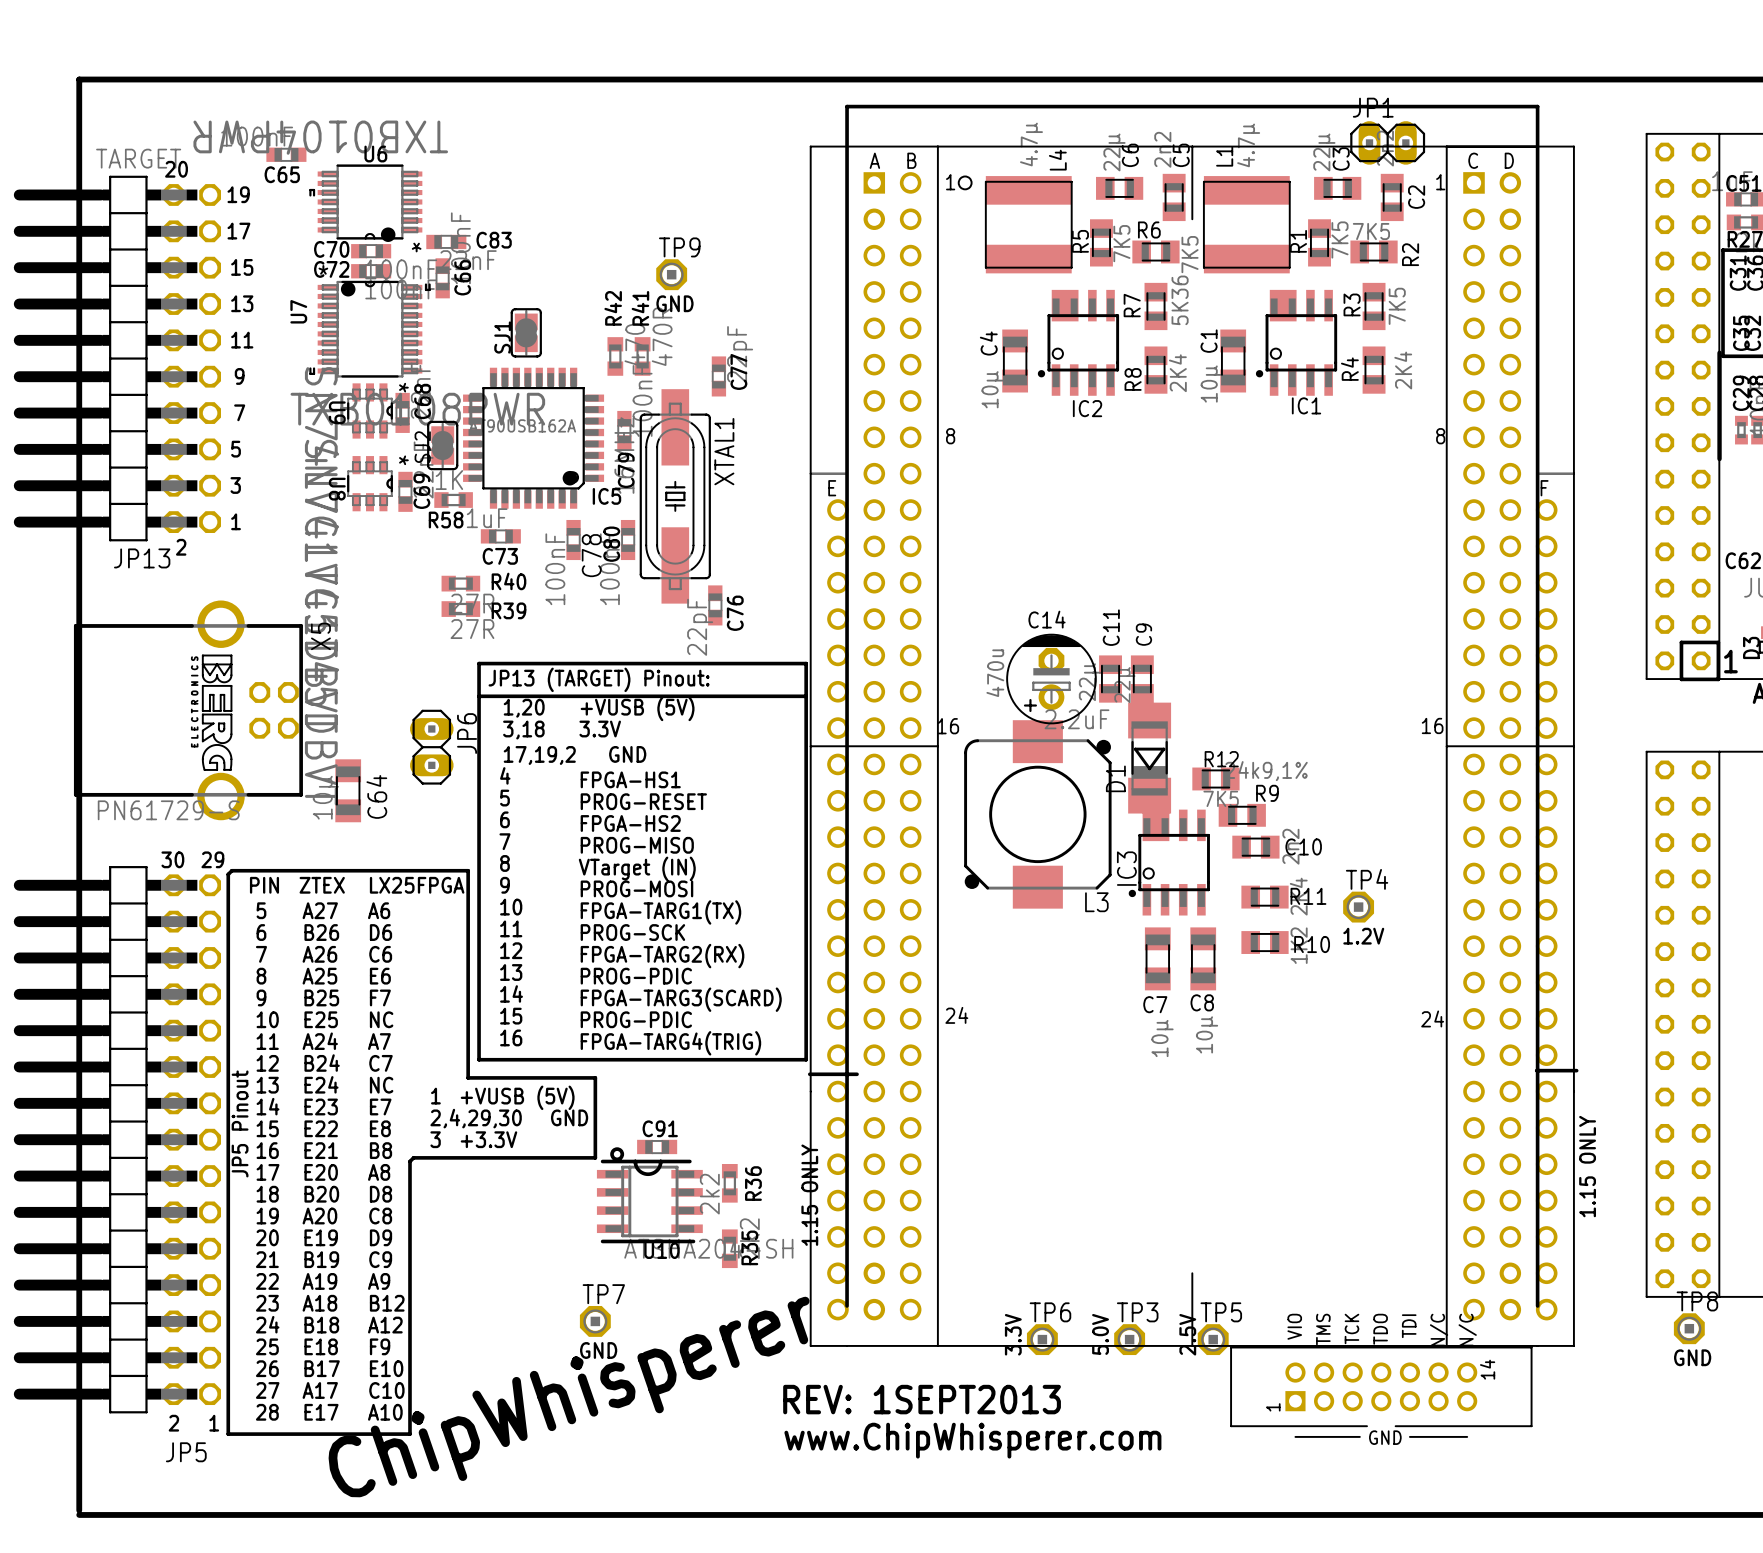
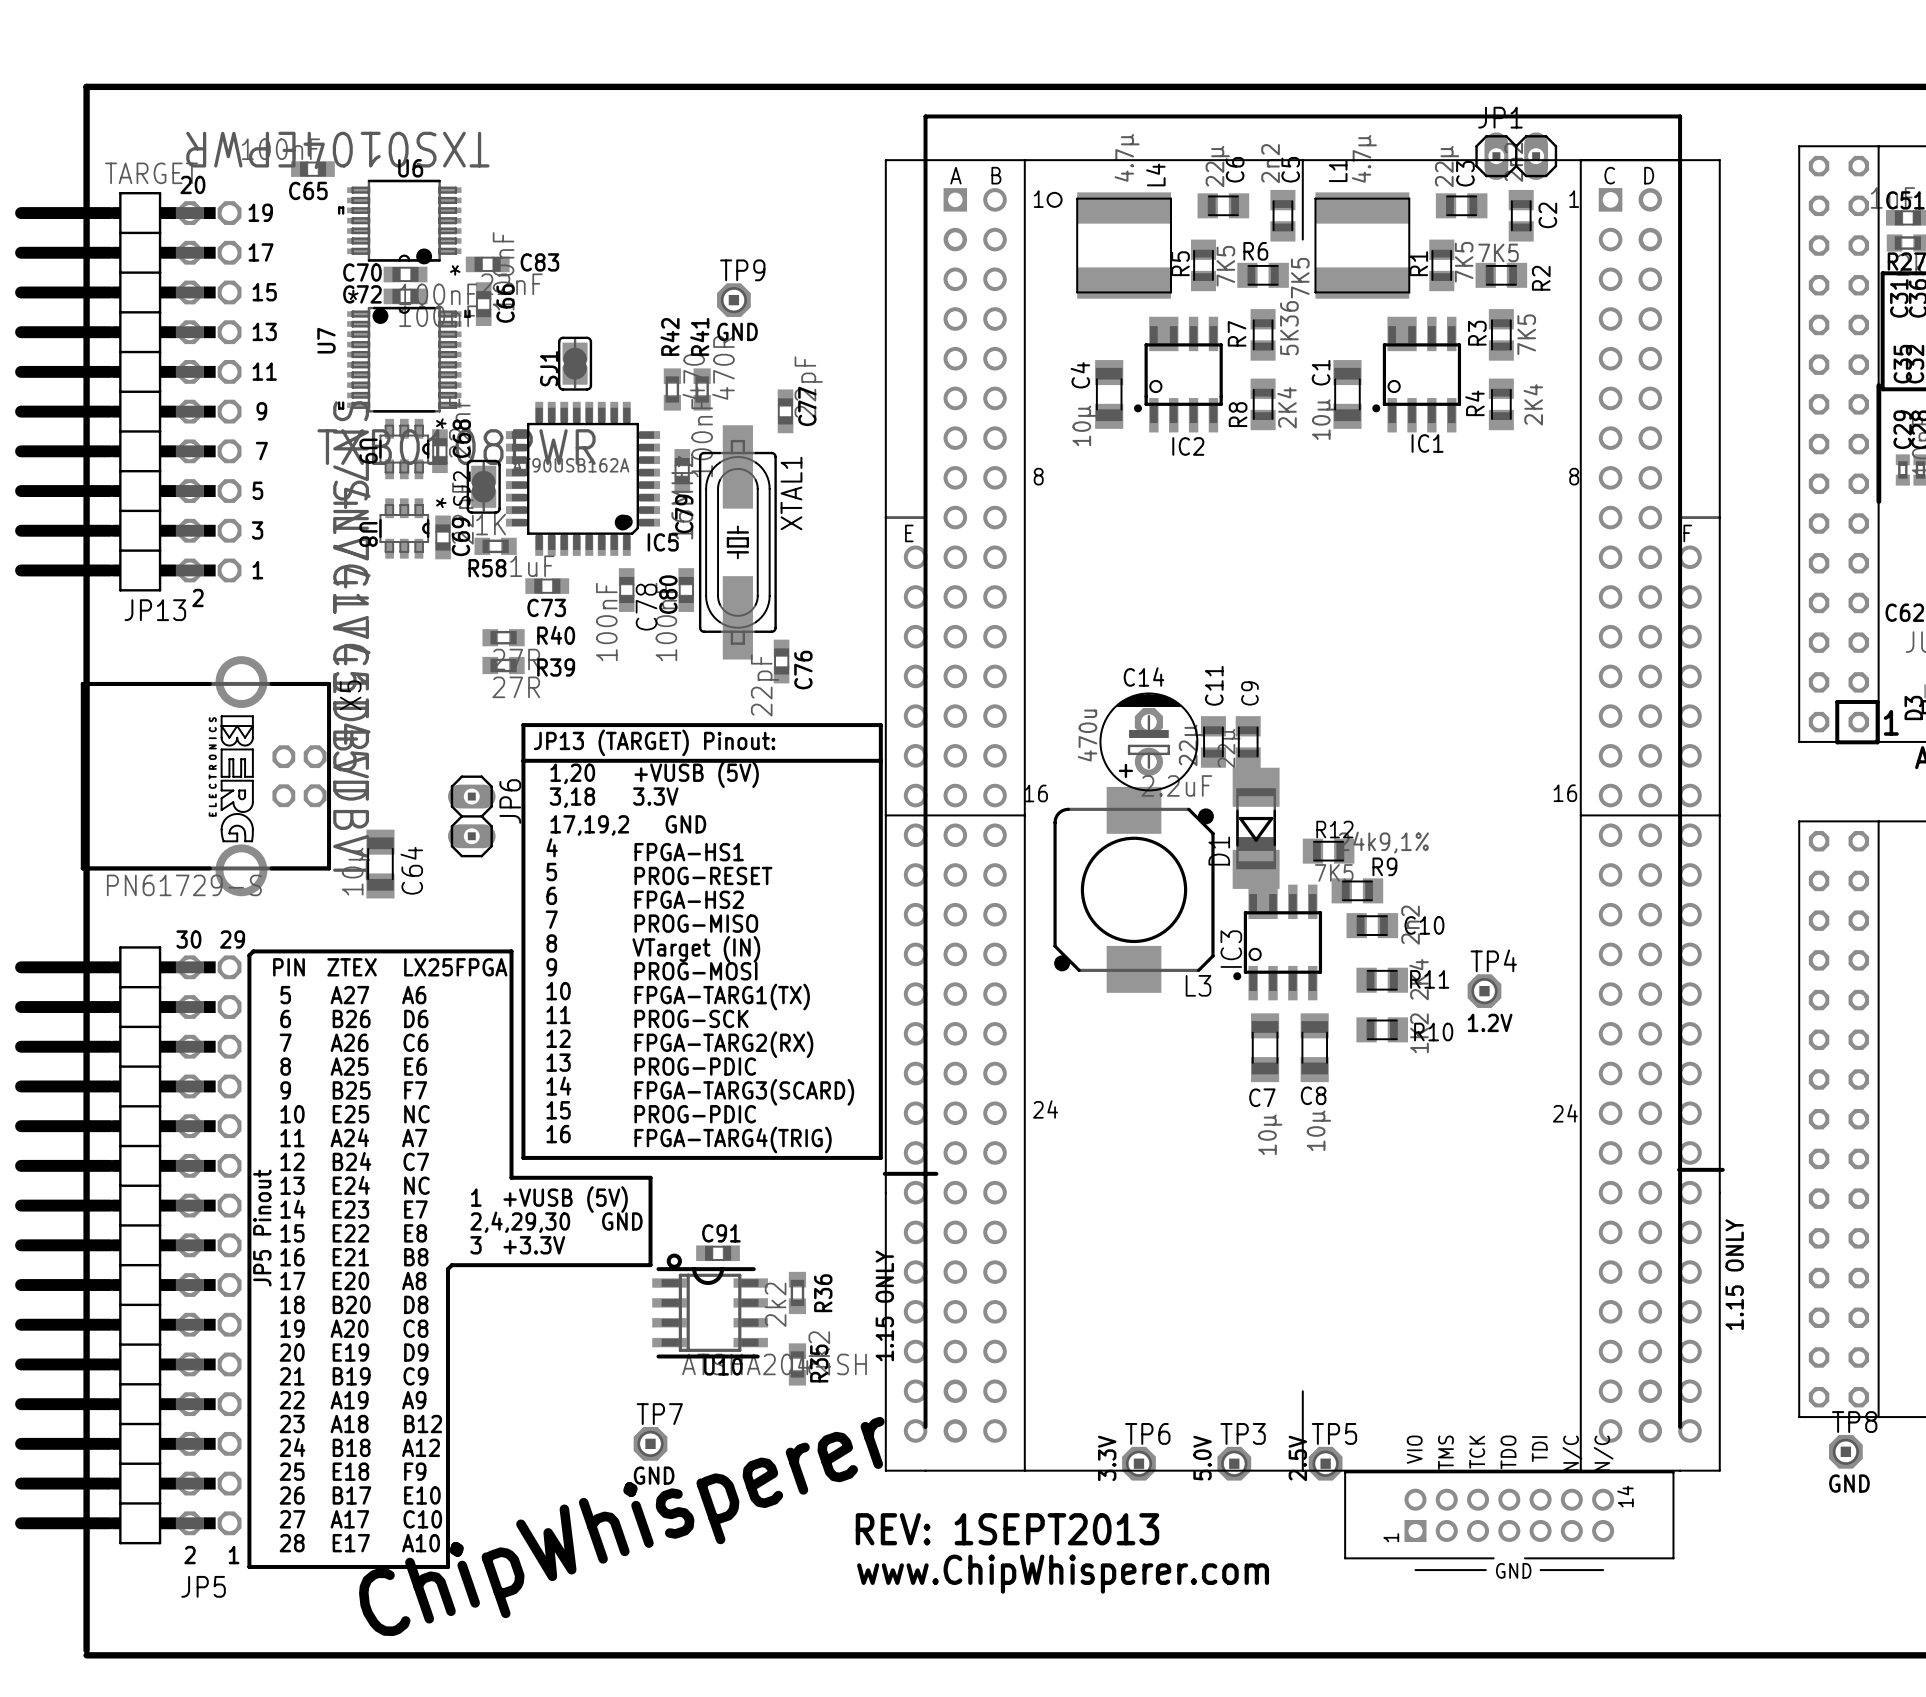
U6 value: TXB0104PWR (320, 137) -> TXS0104EPWR (337, 150)

